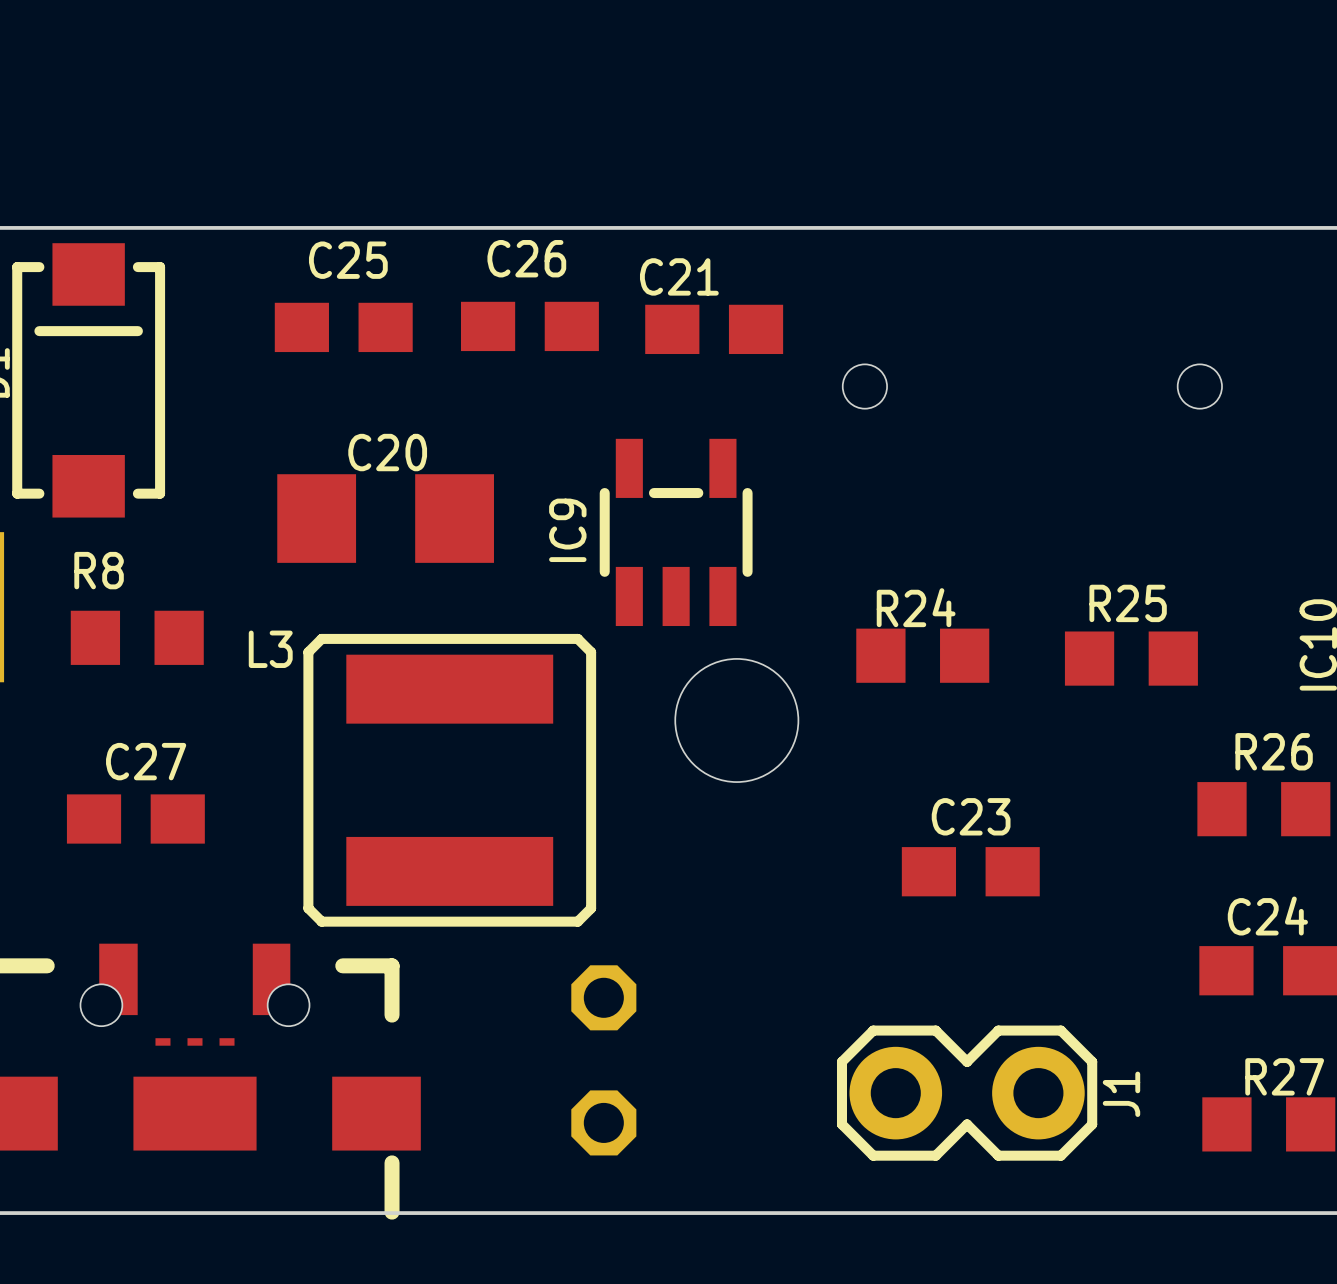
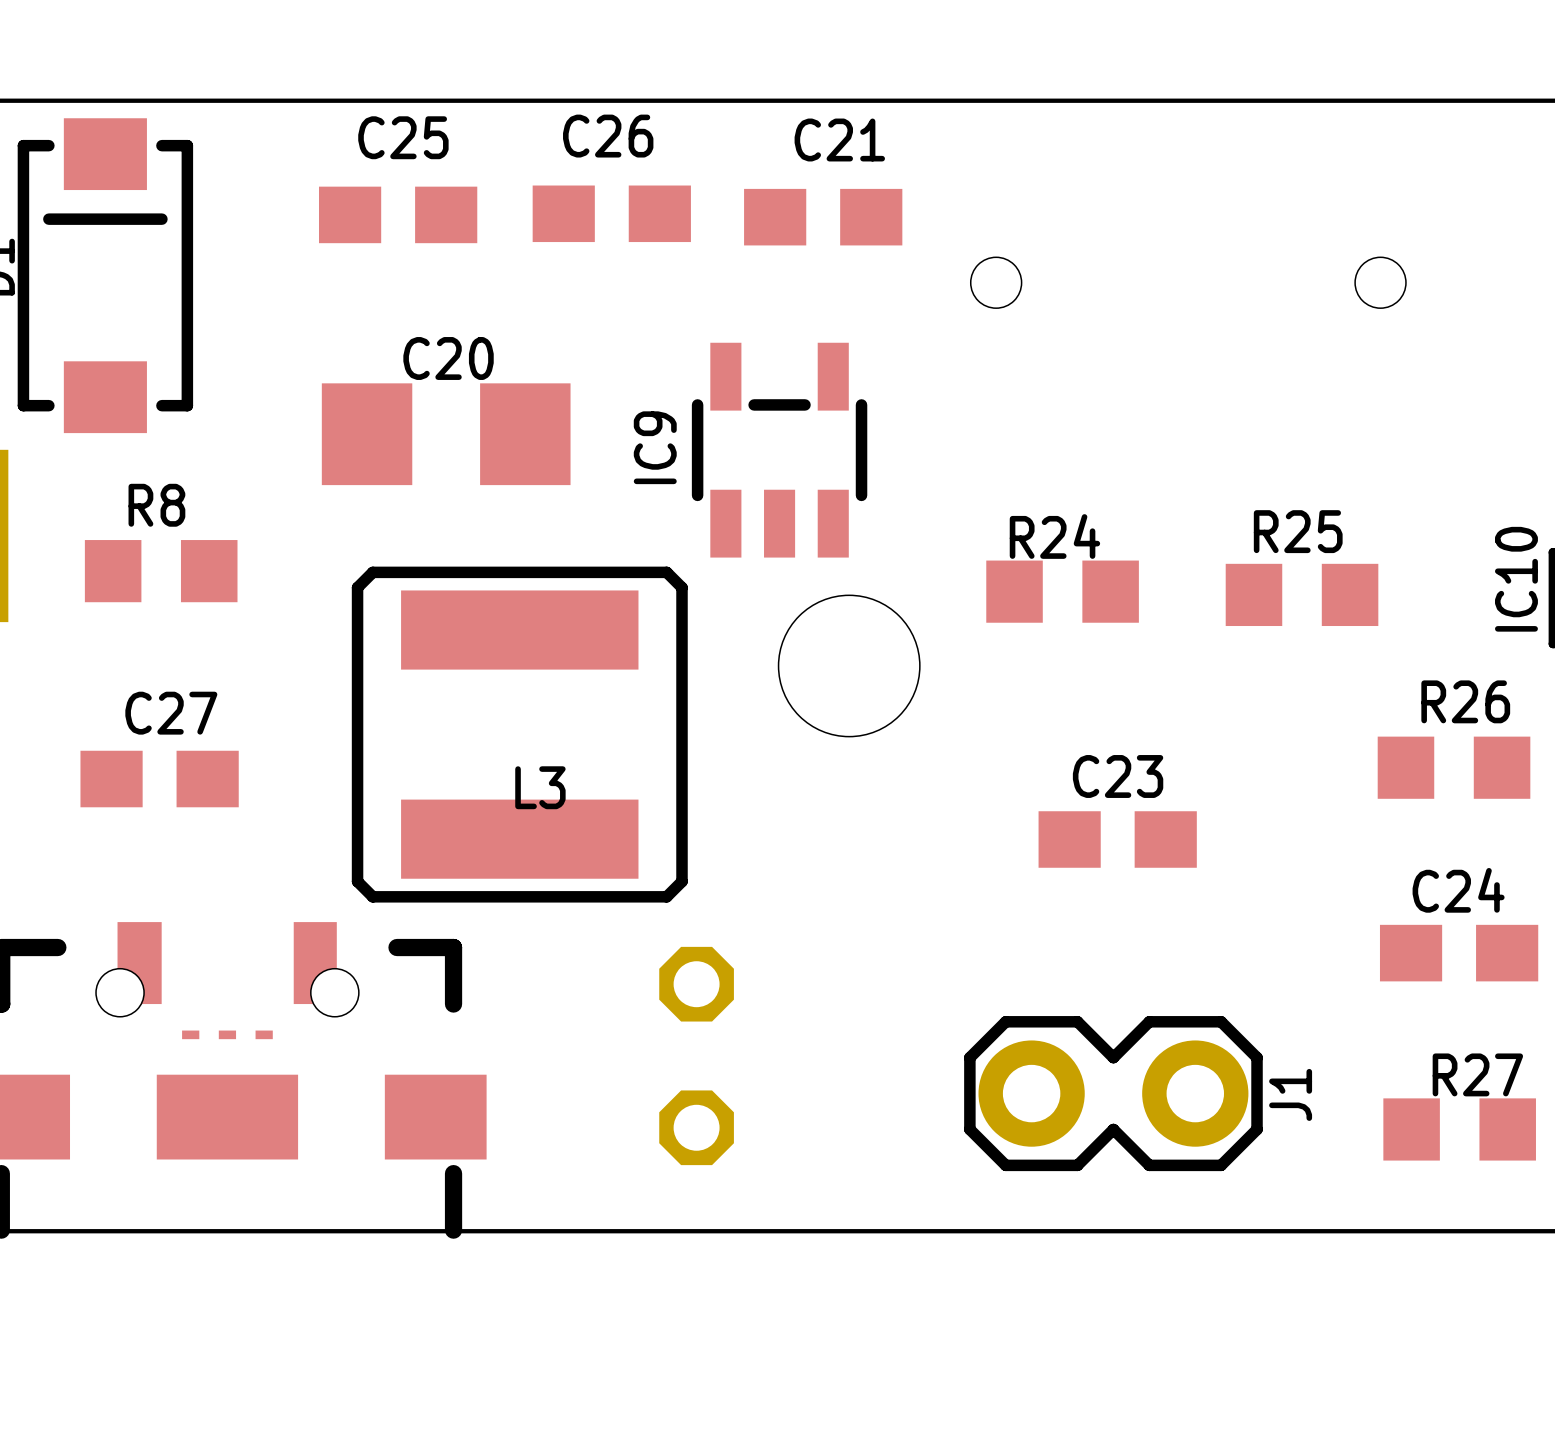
C21 name position: C21 (679, 276) -> C21 (839, 140)
R8 name position: R8 (99, 570) -> R8 (156, 505)
L3 name position: L3 (270, 649) -> L3 (540, 787)

